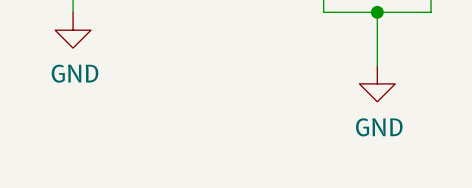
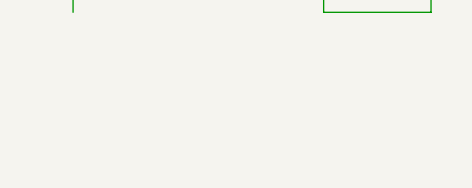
wire: (377, 12) (377, 66) -> none
junction: (377, 12) -> none
power symbol: GND (73, 30) -> none
power symbol: GND (377, 83) -> none

